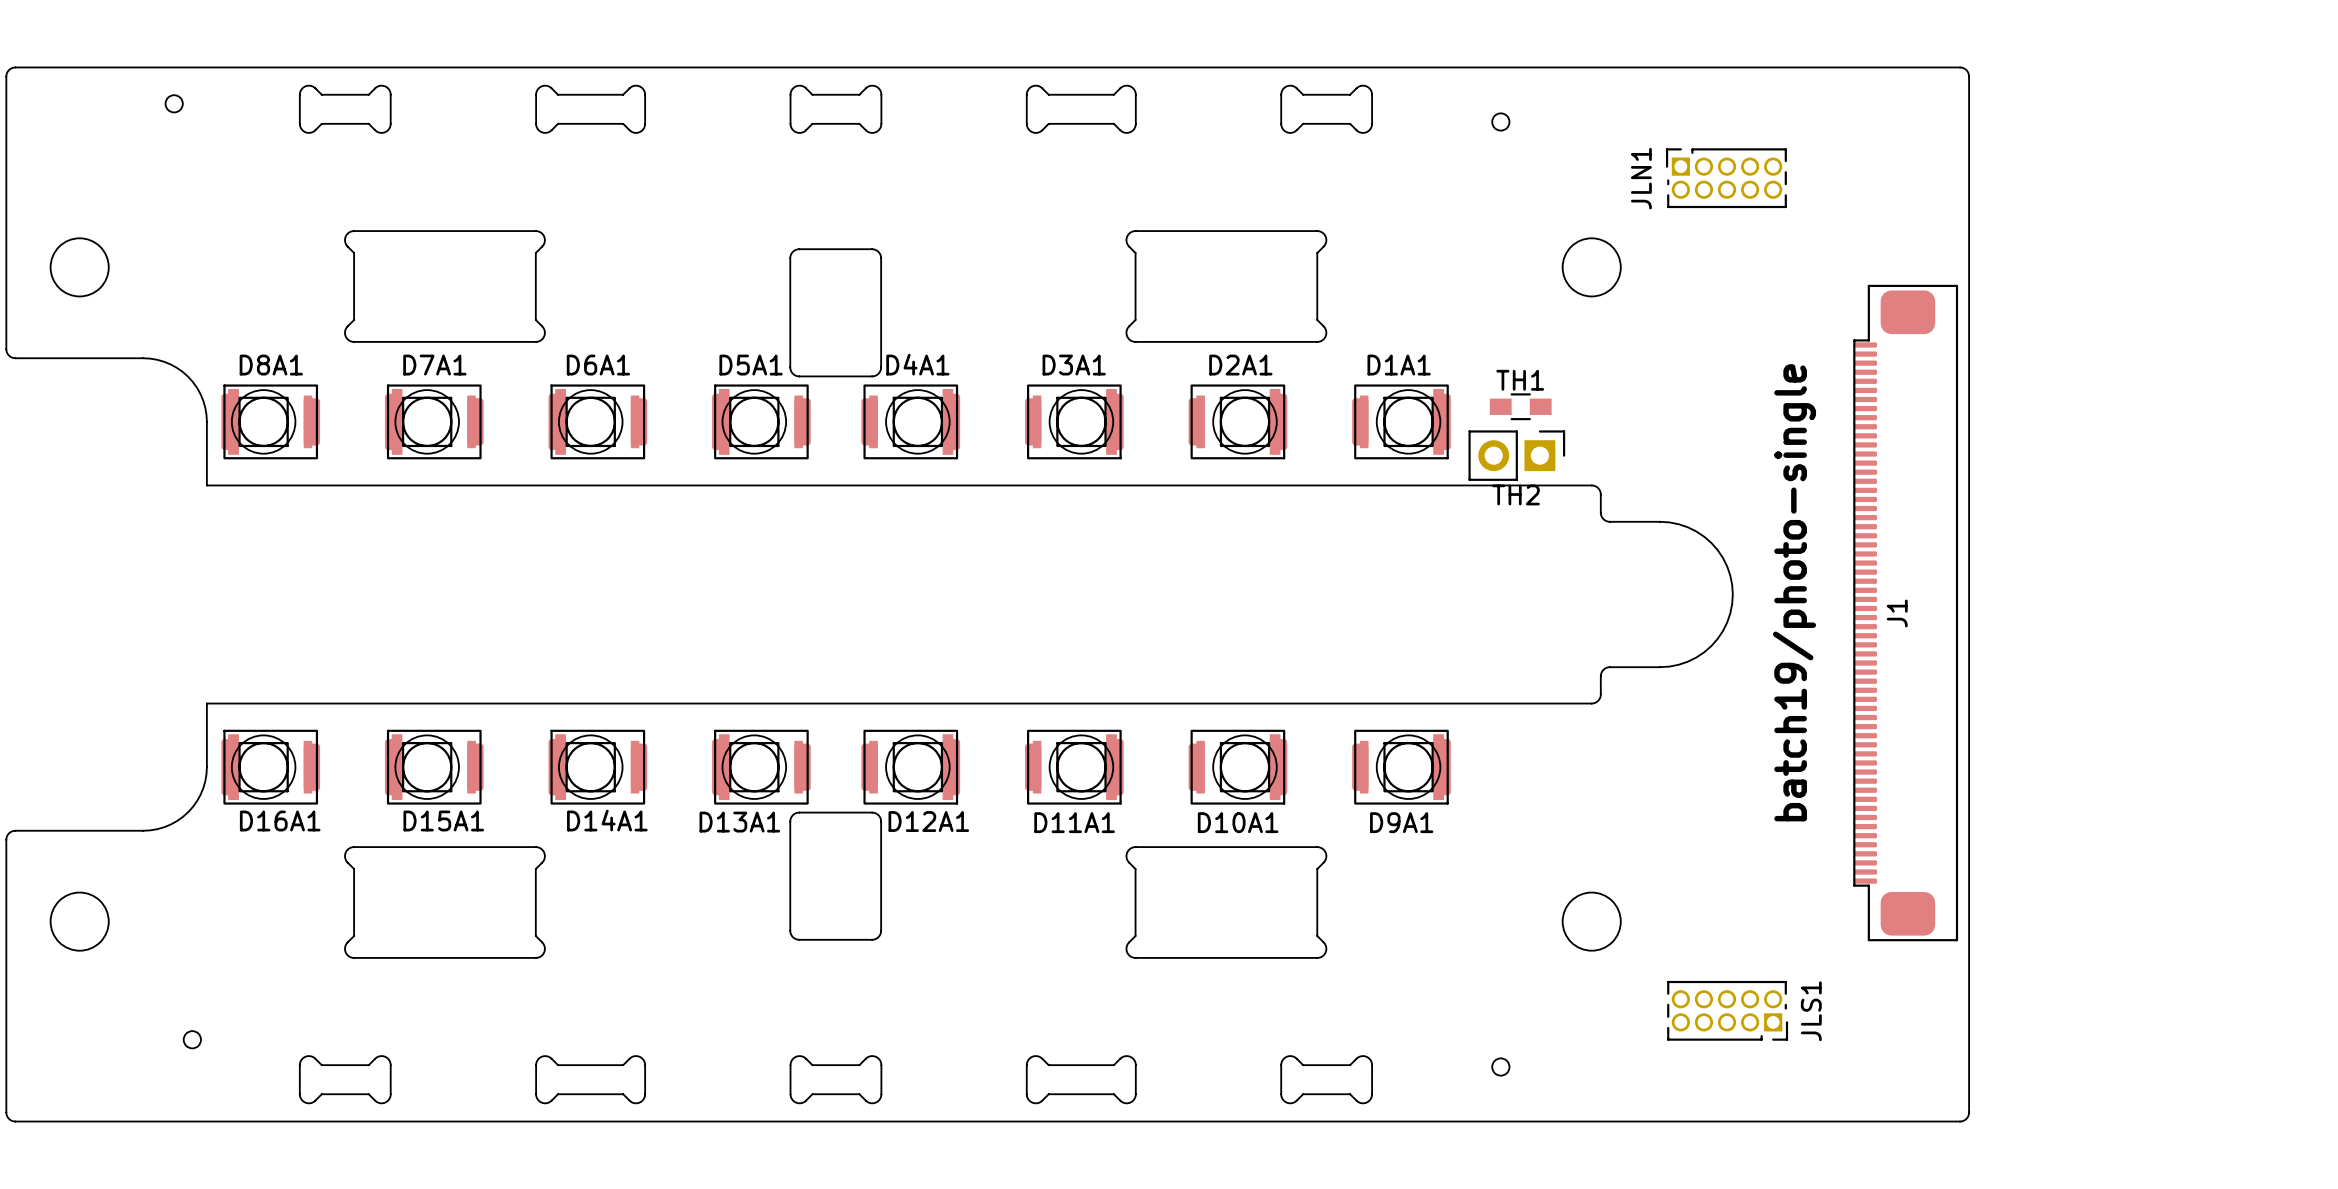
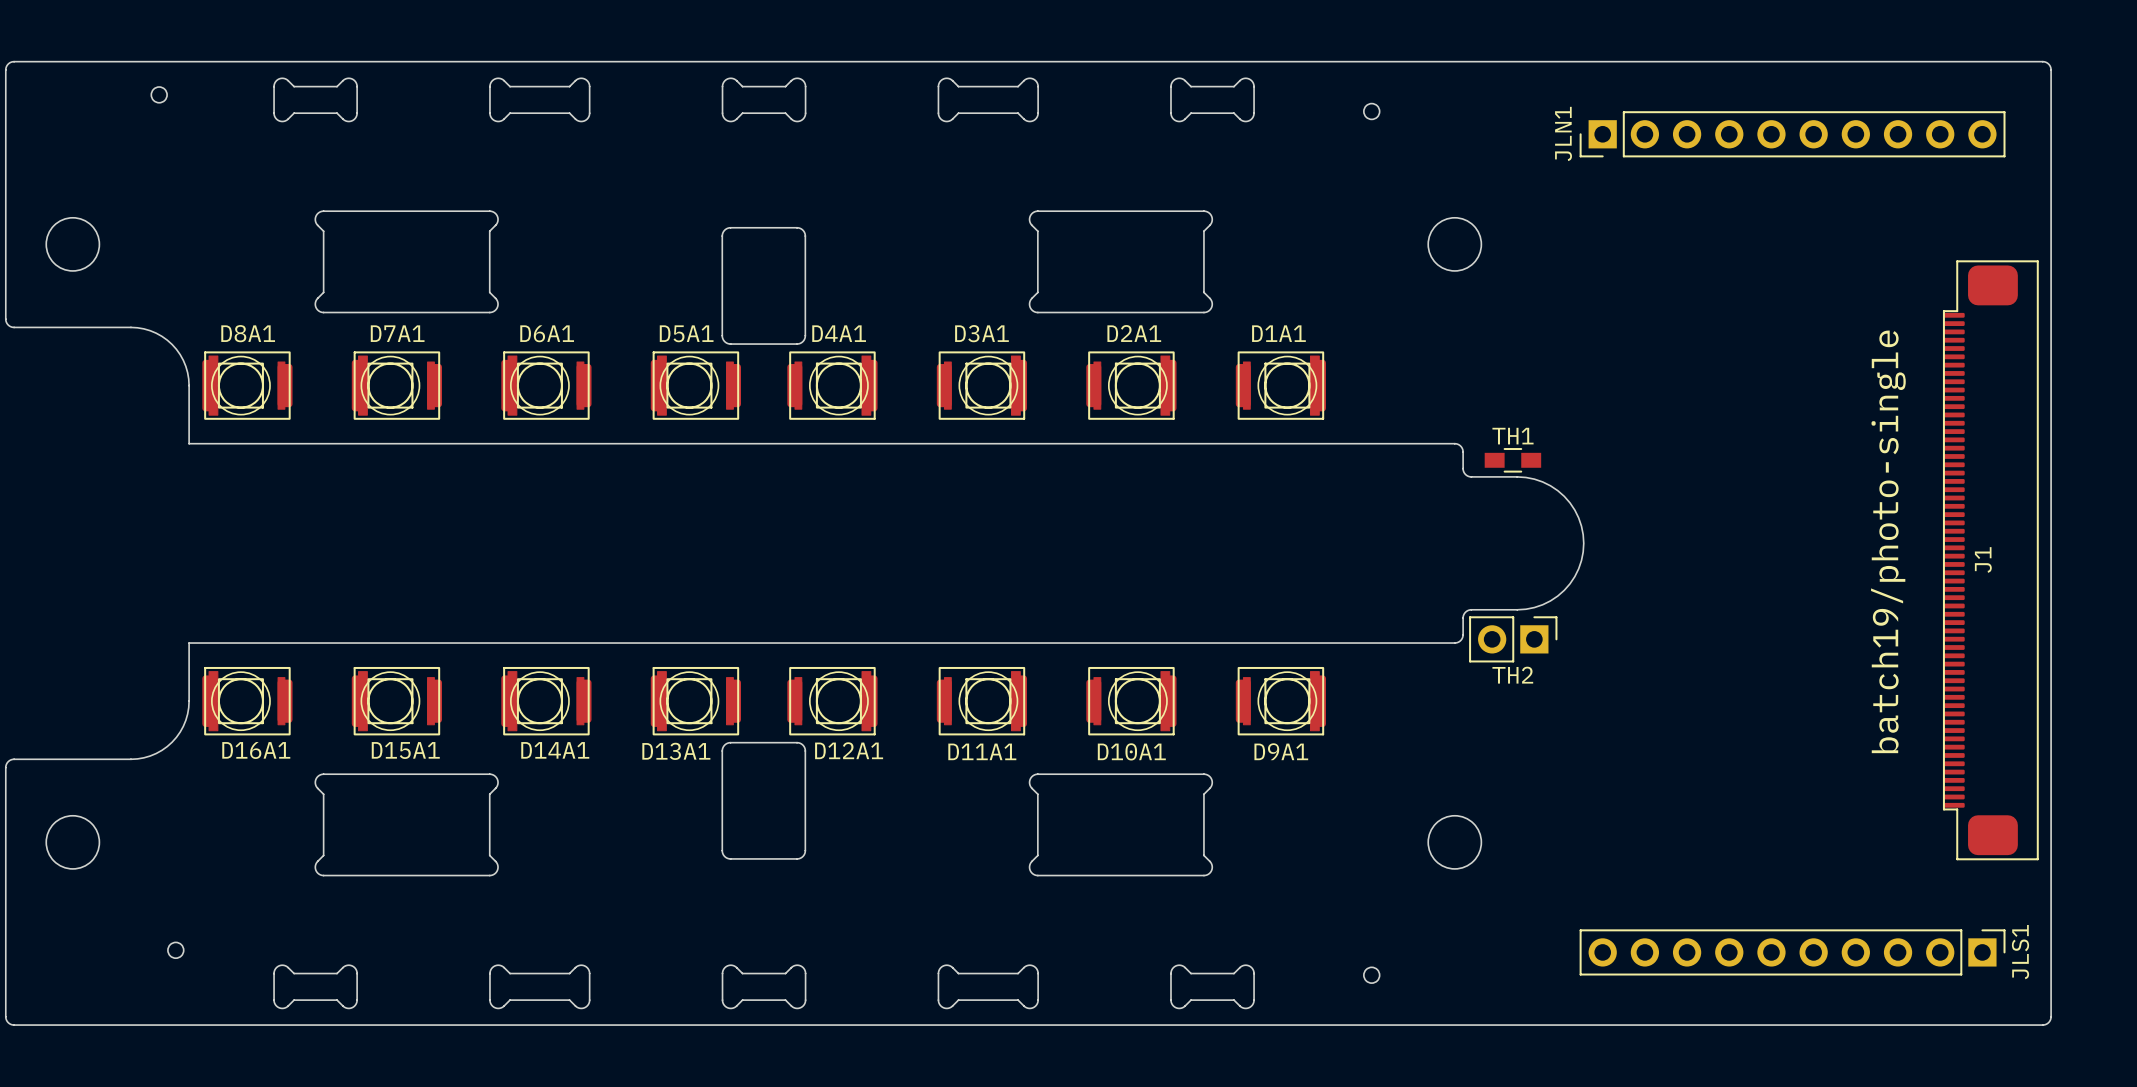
board edge: (1959, 67) (1966, 70) (1969, 76) (1969, 1112) (1966, 1118) (1959, 1121) -> (1791, 61) (2042, 61) (2048, 64) (2051, 69) (2050, 1018) (2047, 1023) (2042, 1025) (1791, 1025)
JLN1 footprint: [1665, 148, 1787, 209] -> [1579, 111, 2006, 158]
JLN1 name position: JLN1 (1641, 178) -> JLN1 (1563, 133)
TH1 position: (1520, 406) -> (1512, 460)
TH2 position: (1516, 455) -> (1513, 639)
text position: batch19/photo-single (1794, 592) -> batch19/photo-single (1888, 541)
J1 position: (1905, 613) -> (1990, 560)
JLS1 footprint: [1667, 980, 1789, 1041] -> [1579, 929, 2006, 976]
JLS1 name position: JLS1 (1811, 1011) -> JLS1 (2020, 952)

